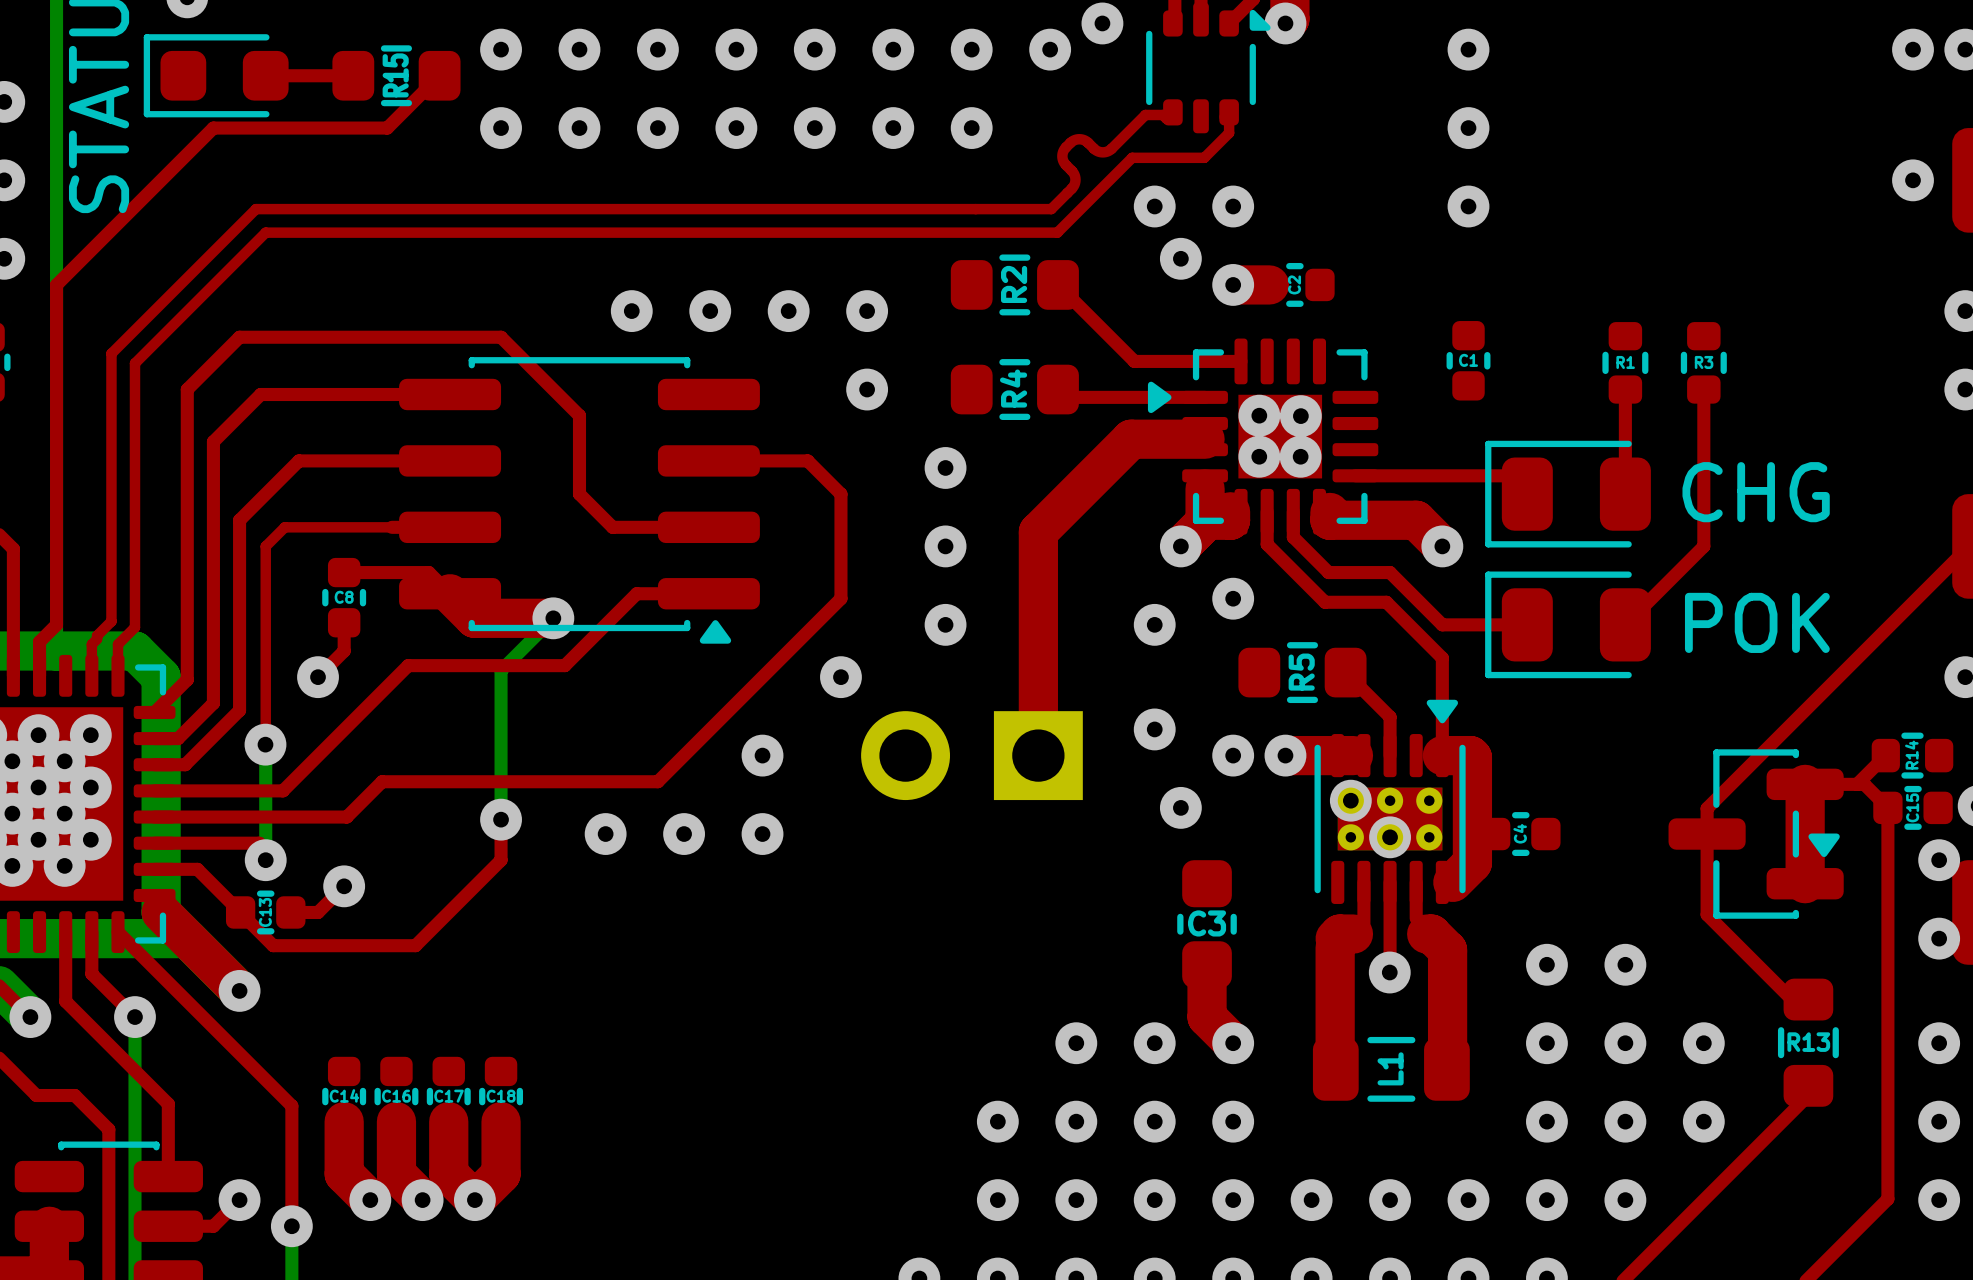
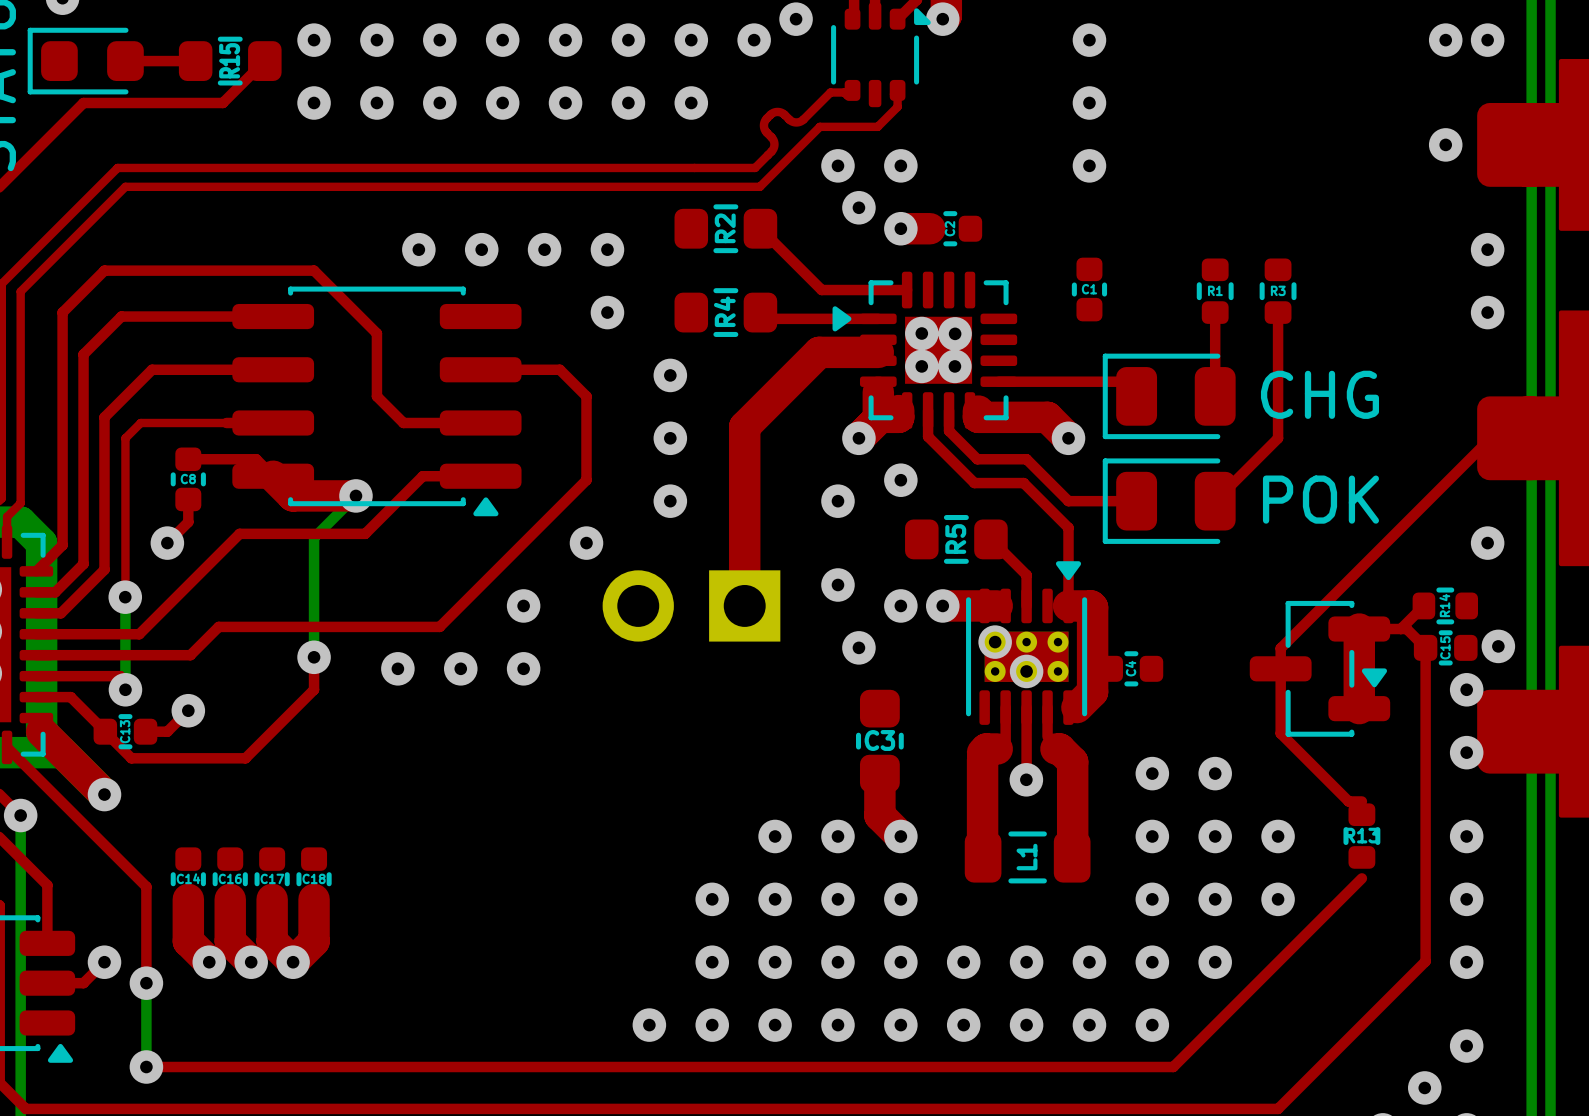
R13 footprint: [1777, 978, 1839, 1107] -> [1343, 803, 1381, 869]

